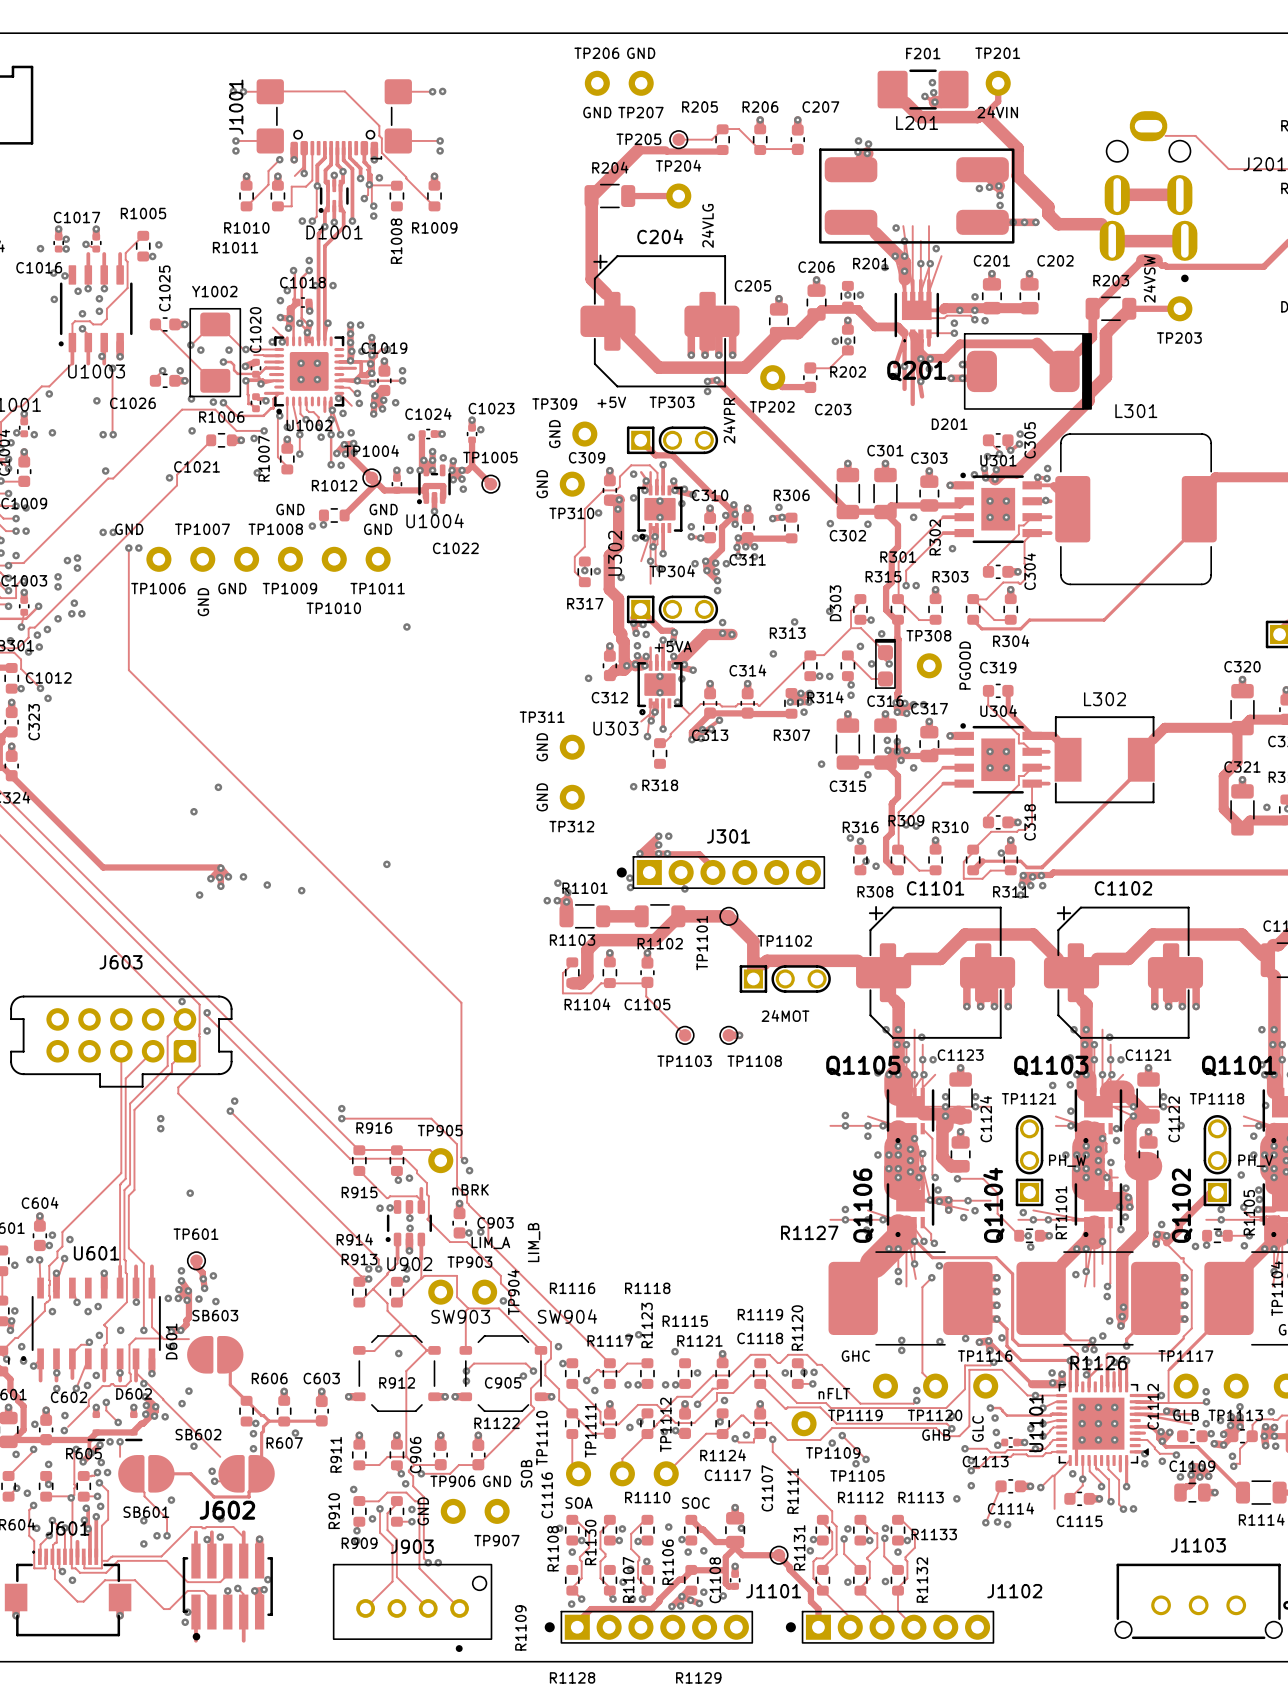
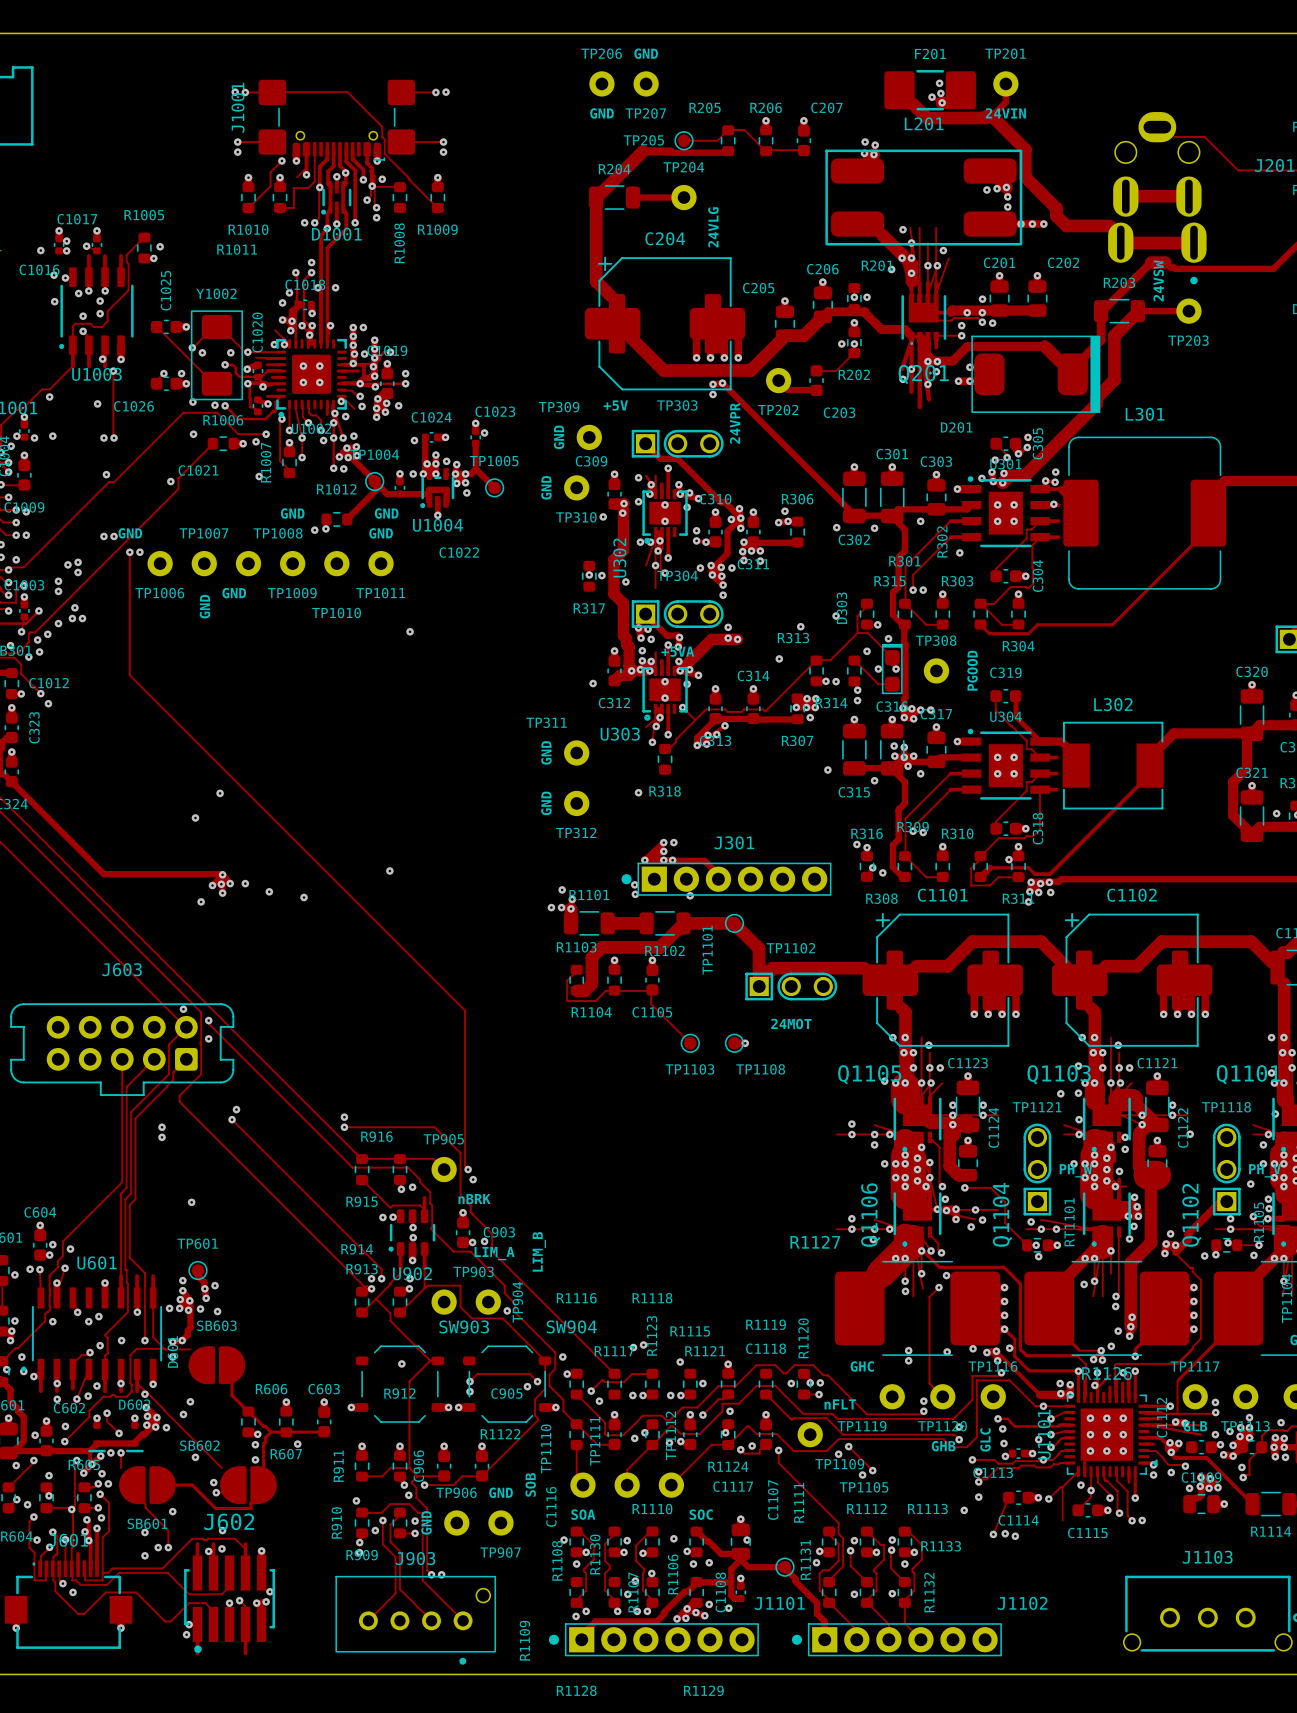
track: (656, 480) (657, 472) (649, 465) (631, 465) (619, 476) (619, 486) (616, 490) (603, 490) (584, 509) (584, 546) (574, 556) (574, 571) (584, 582) -> none
track: (468, 1308) (465, 1310) (465, 1351) -> none
track: (400, 1324) (374, 1351) (359, 1350) -> none

